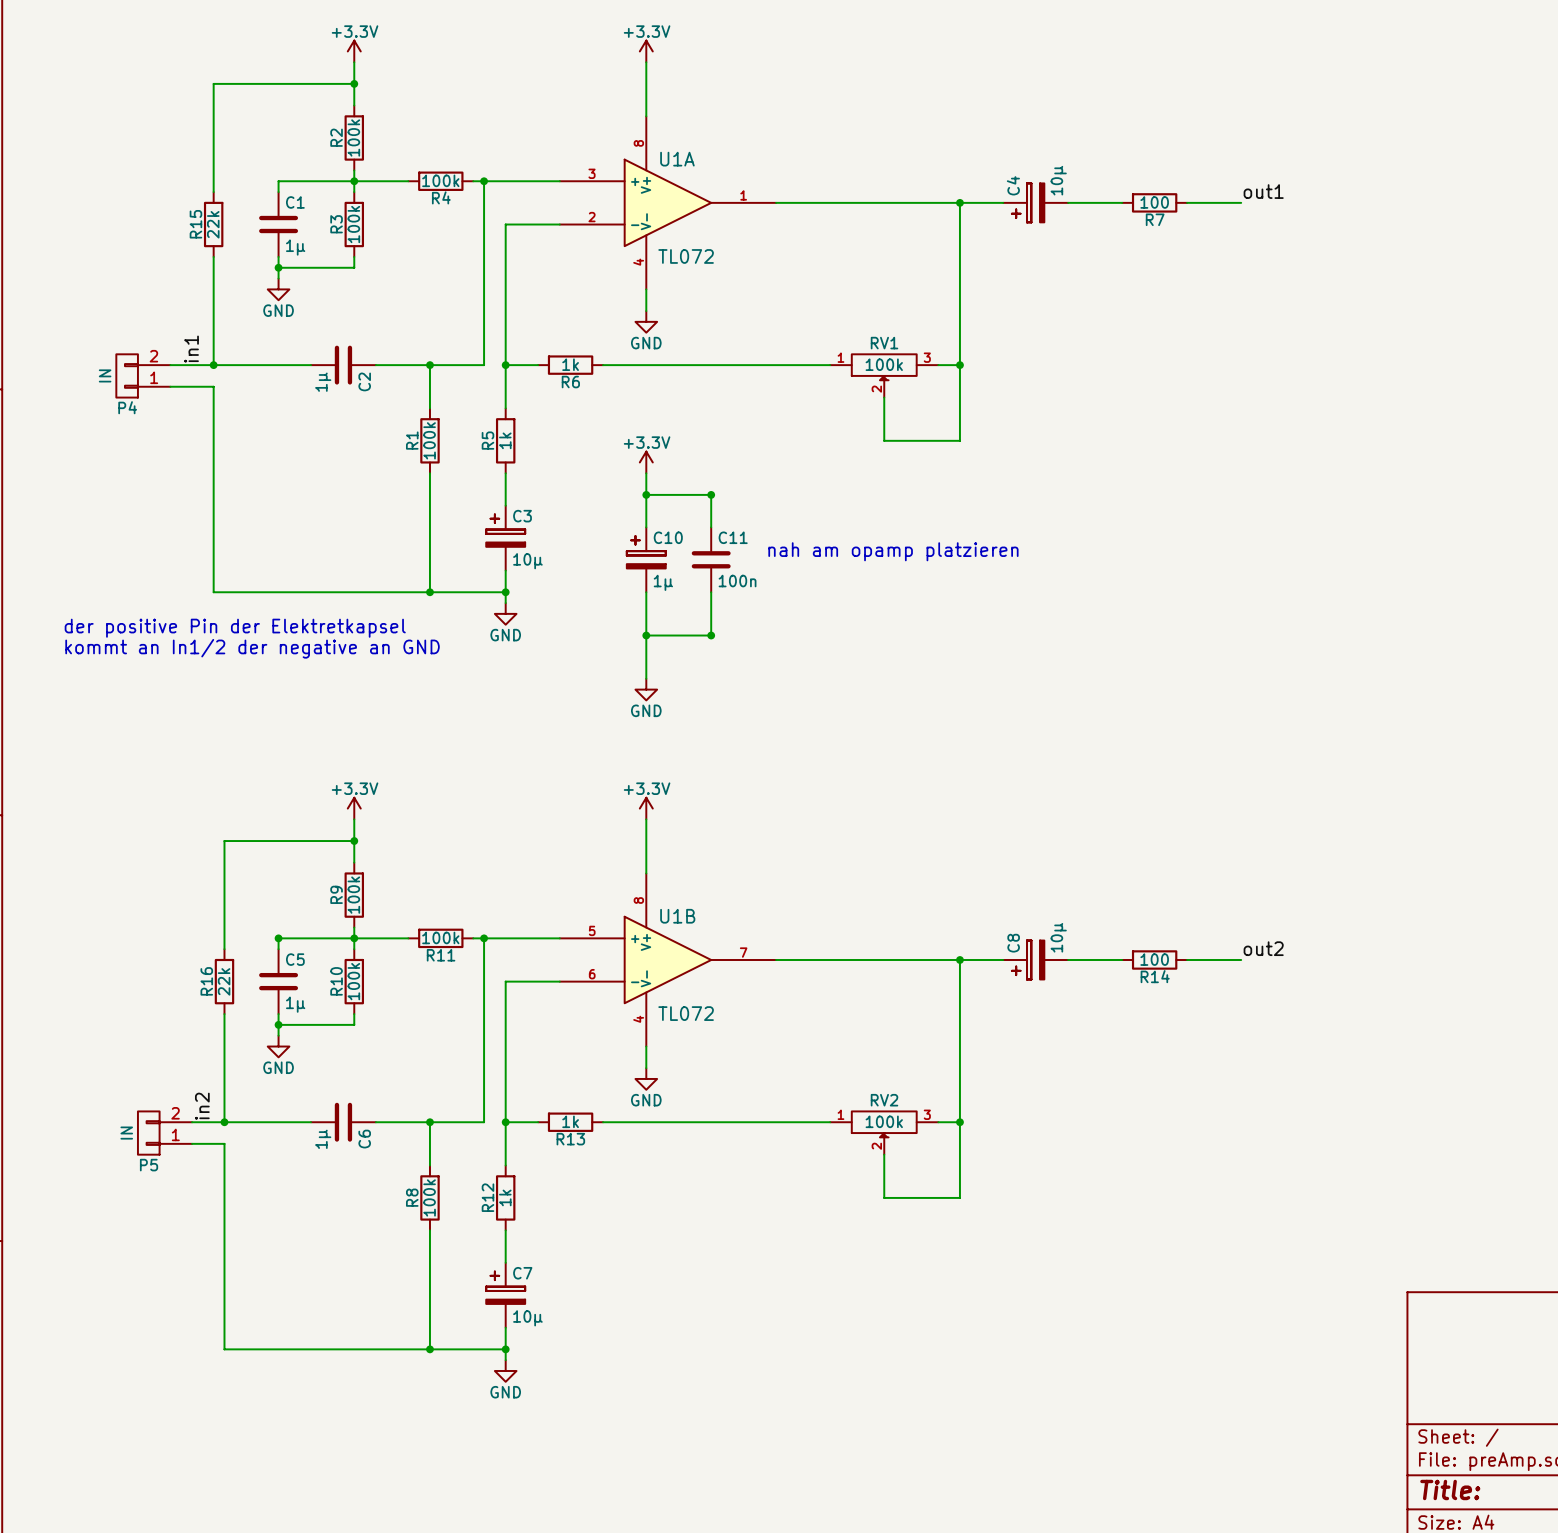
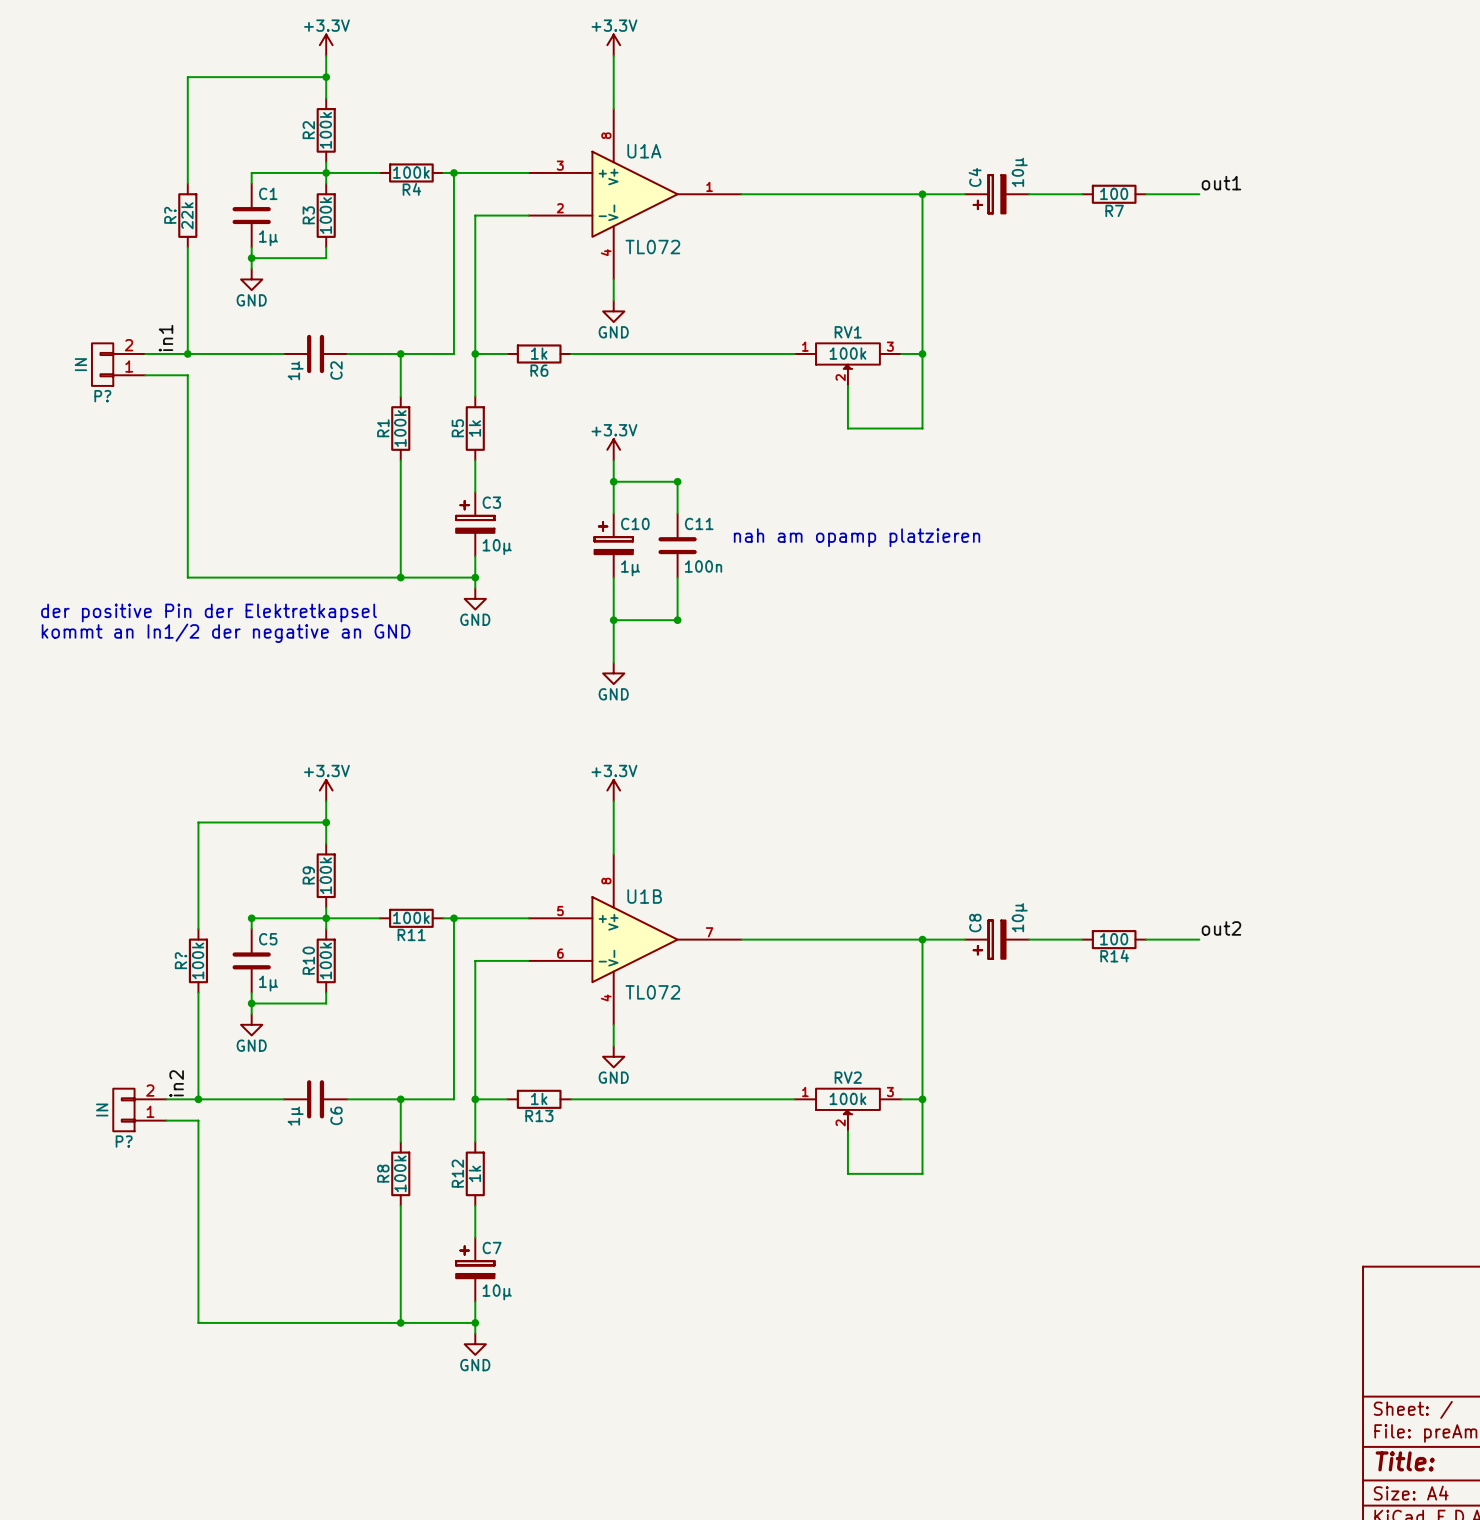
R15 name: R15 (195, 224) -> R? (170, 215)
P4 name: P4 (127, 407) -> P? (102, 396)
R16 name: R16 (206, 981) -> R? (181, 960)
R16 value: 22k (224, 981) -> 100k (198, 960)
P5 name: P5 (149, 1165) -> P? (124, 1141)

